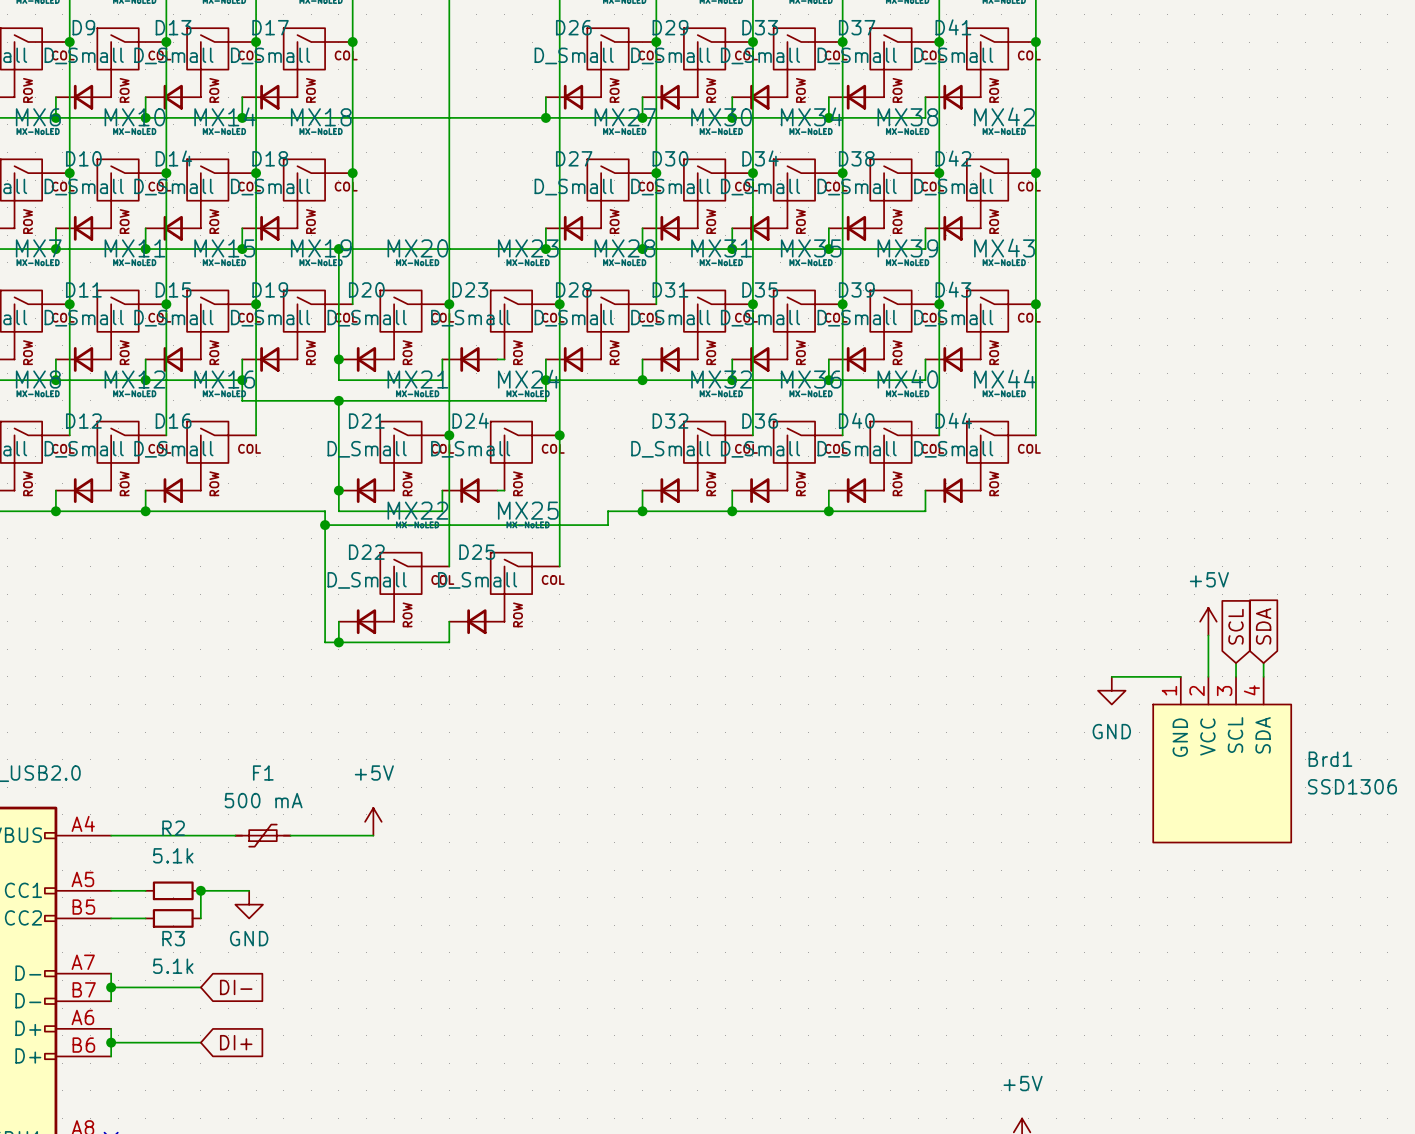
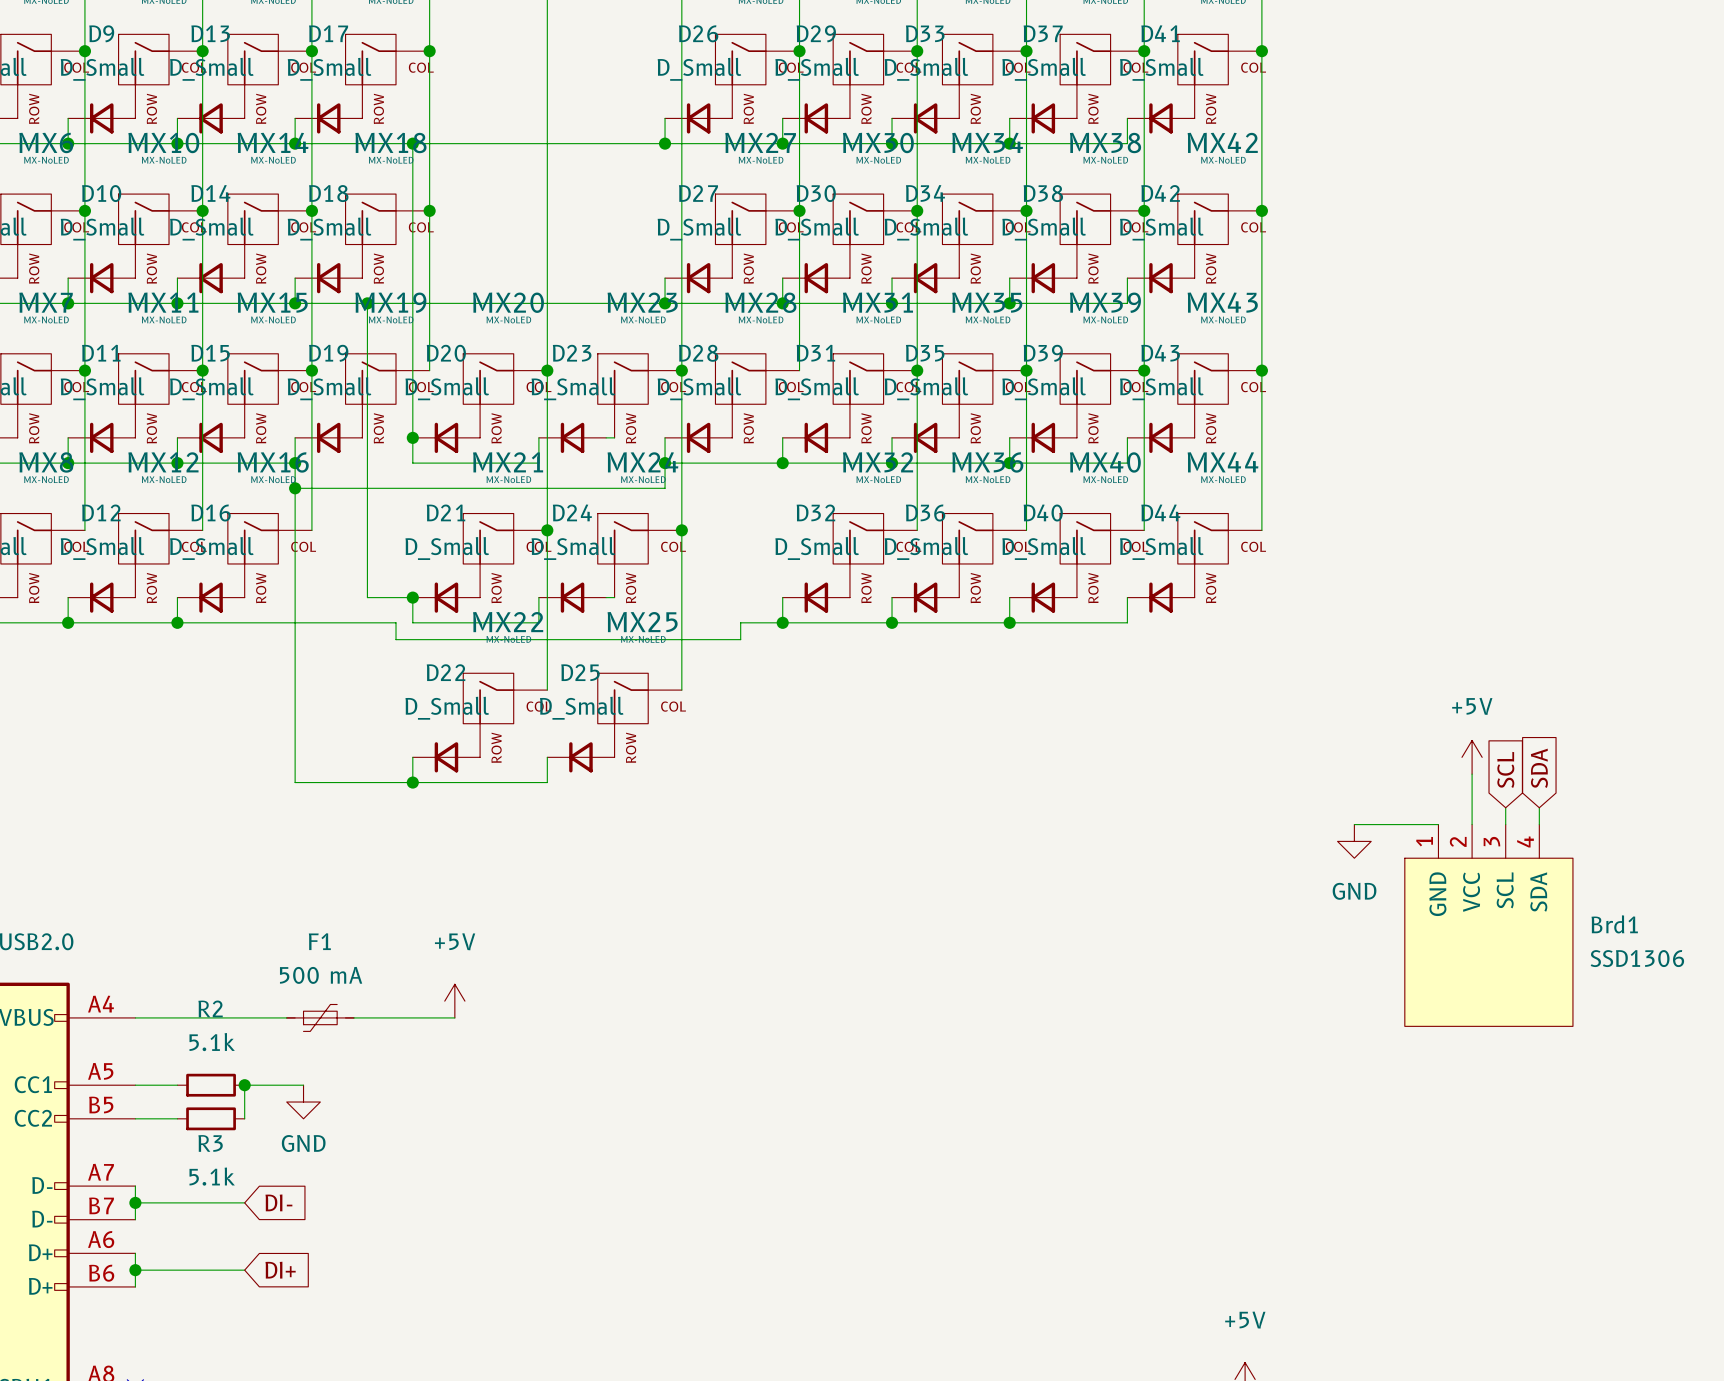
wire: none -> (412, 143) (412, 303)
junction: none -> (412, 143)
junction position: (338, 249) -> (367, 303)
junction: none -> (295, 488)
wire: (338, 400) (338, 490) -> (367, 303) (367, 597) (412, 597)
junction: (338, 400) -> none
wire: (325, 525) (325, 642) -> (295, 488) (295, 782) (396, 782)
junction: (325, 525) -> none

